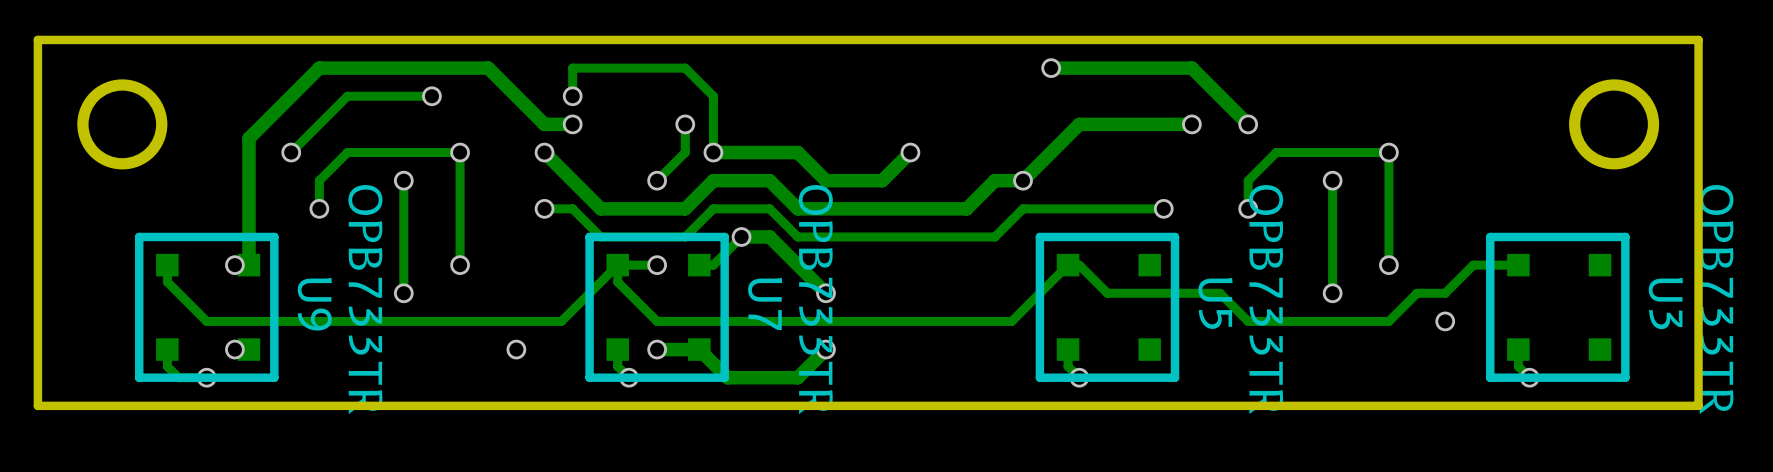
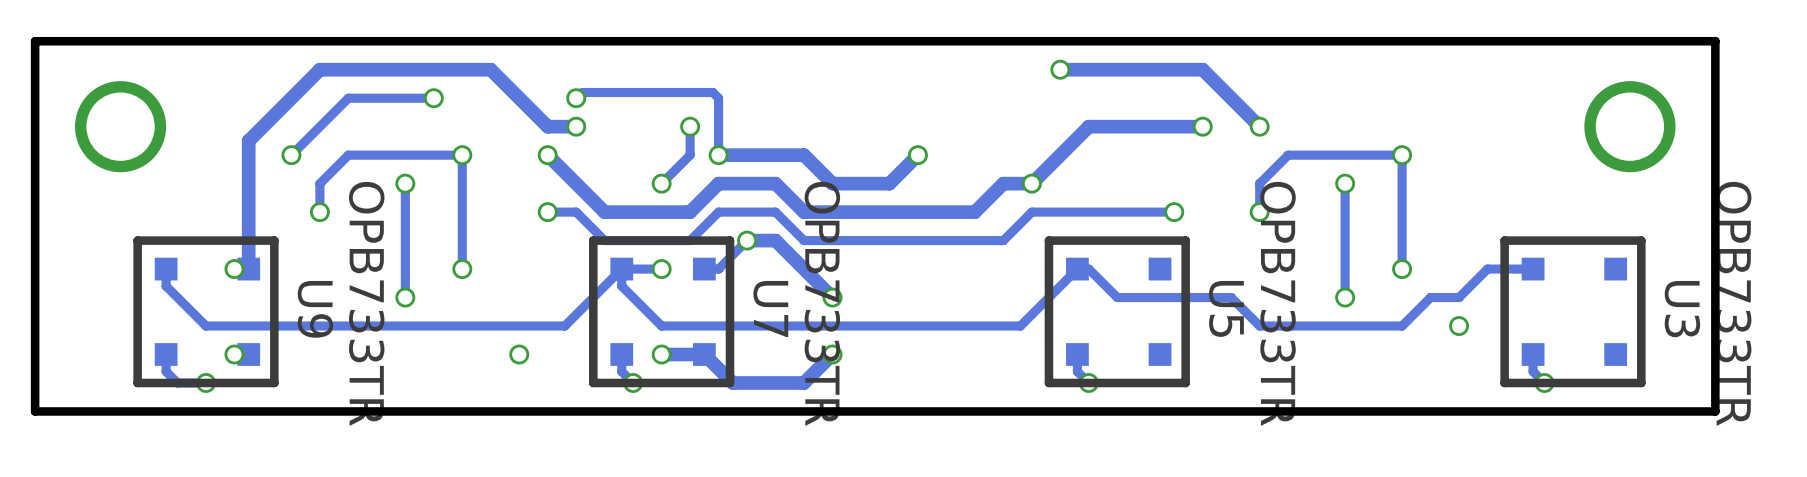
track: (707, 90) (685, 68) (572, 68) (572, 96) -> (712, 92) (581, 92)

